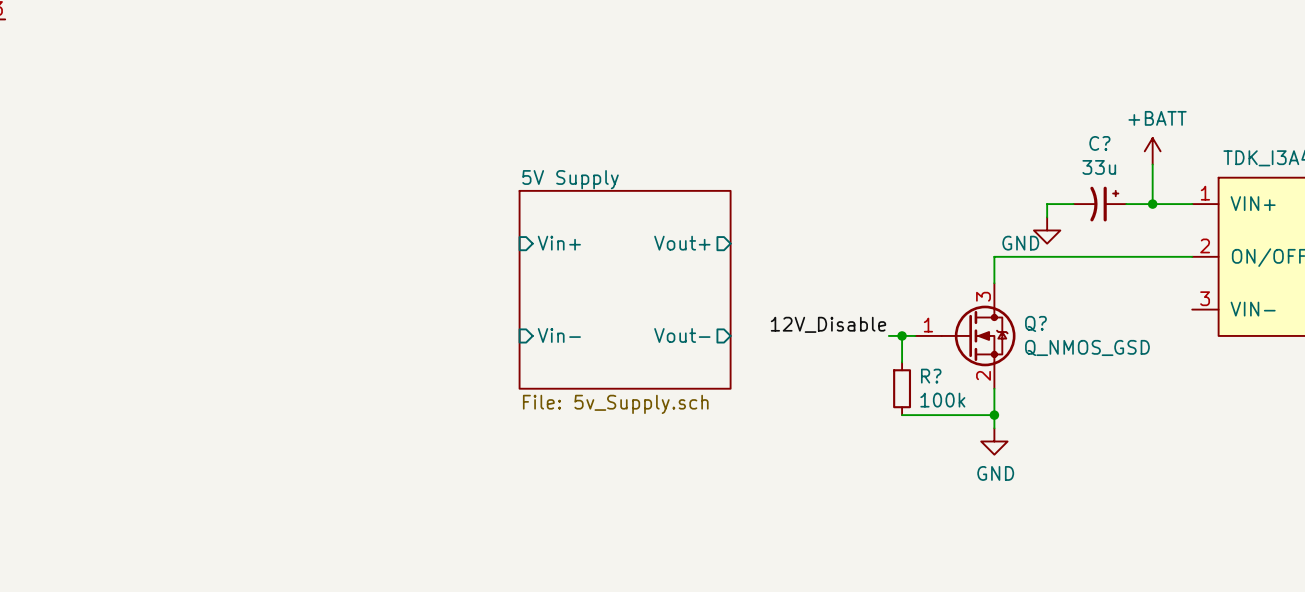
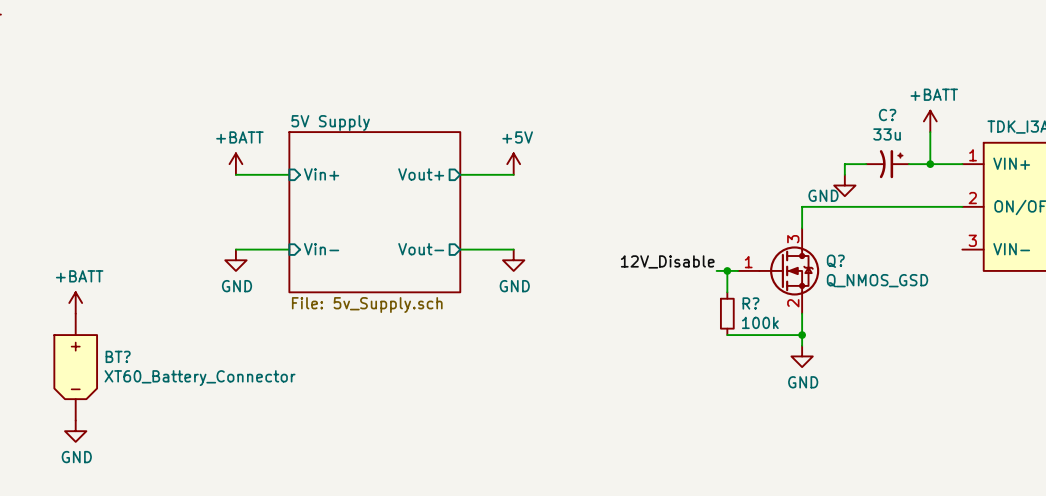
power symbol: none -> +BATT (235, 164)
power symbol: none -> +5V (513, 164)
wire: none -> (235, 174) (289, 174)
wire: none -> (460, 174) (513, 174)
sheet pin position: Vin+ (559, 243) -> Vin+ (321, 174)
sheet pin position: Vout+ (682, 243) -> Vout+ (421, 174)
sheet 5V Supply position: (625, 289) -> (374, 212)
wire: none -> (235, 249) (289, 249)
wire: none -> (460, 249) (513, 249)
power symbol: none -> GND (235, 260)
power symbol: none -> GND (513, 260)
sheet pin position: Vin- (559, 335) -> Vin- (321, 249)
sheet pin position: Vout- (682, 335) -> Vout- (421, 249)
power symbol: none -> +BATT (75, 303)
BT?: none -> XT60_Battery_Connector (75, 367)
power symbol: none -> GND (75, 431)

